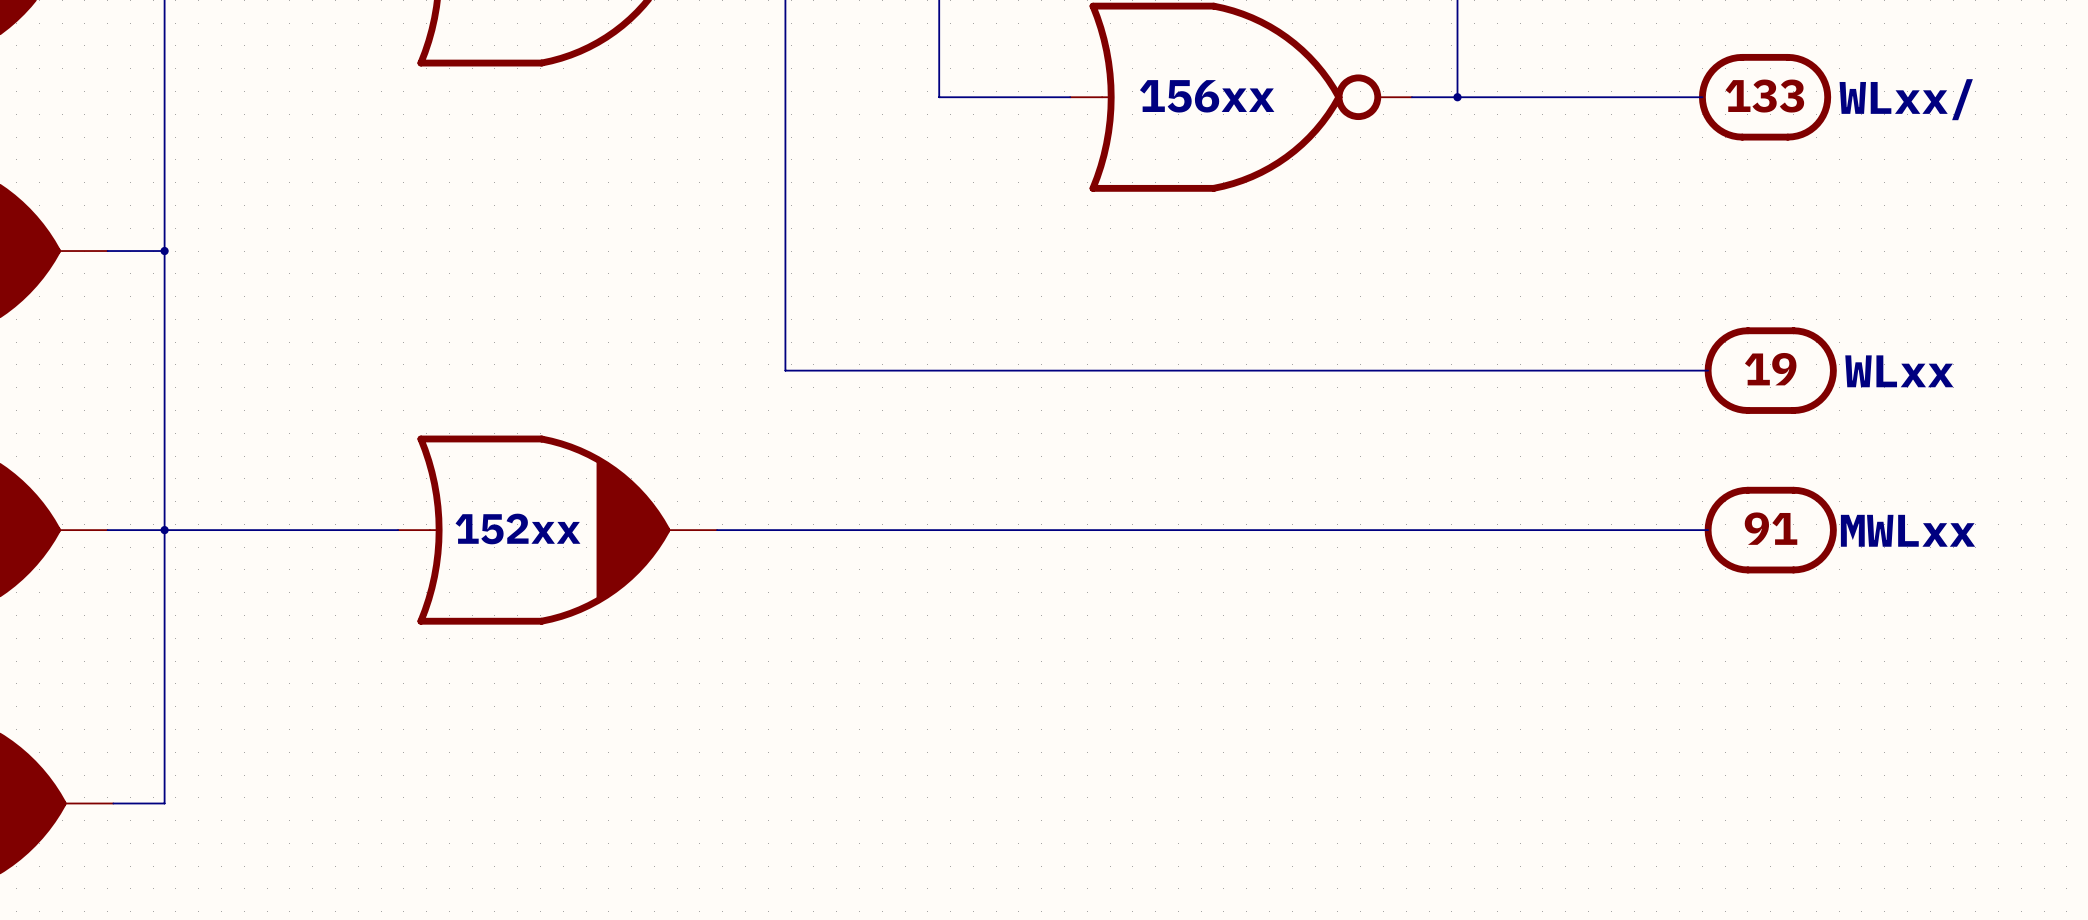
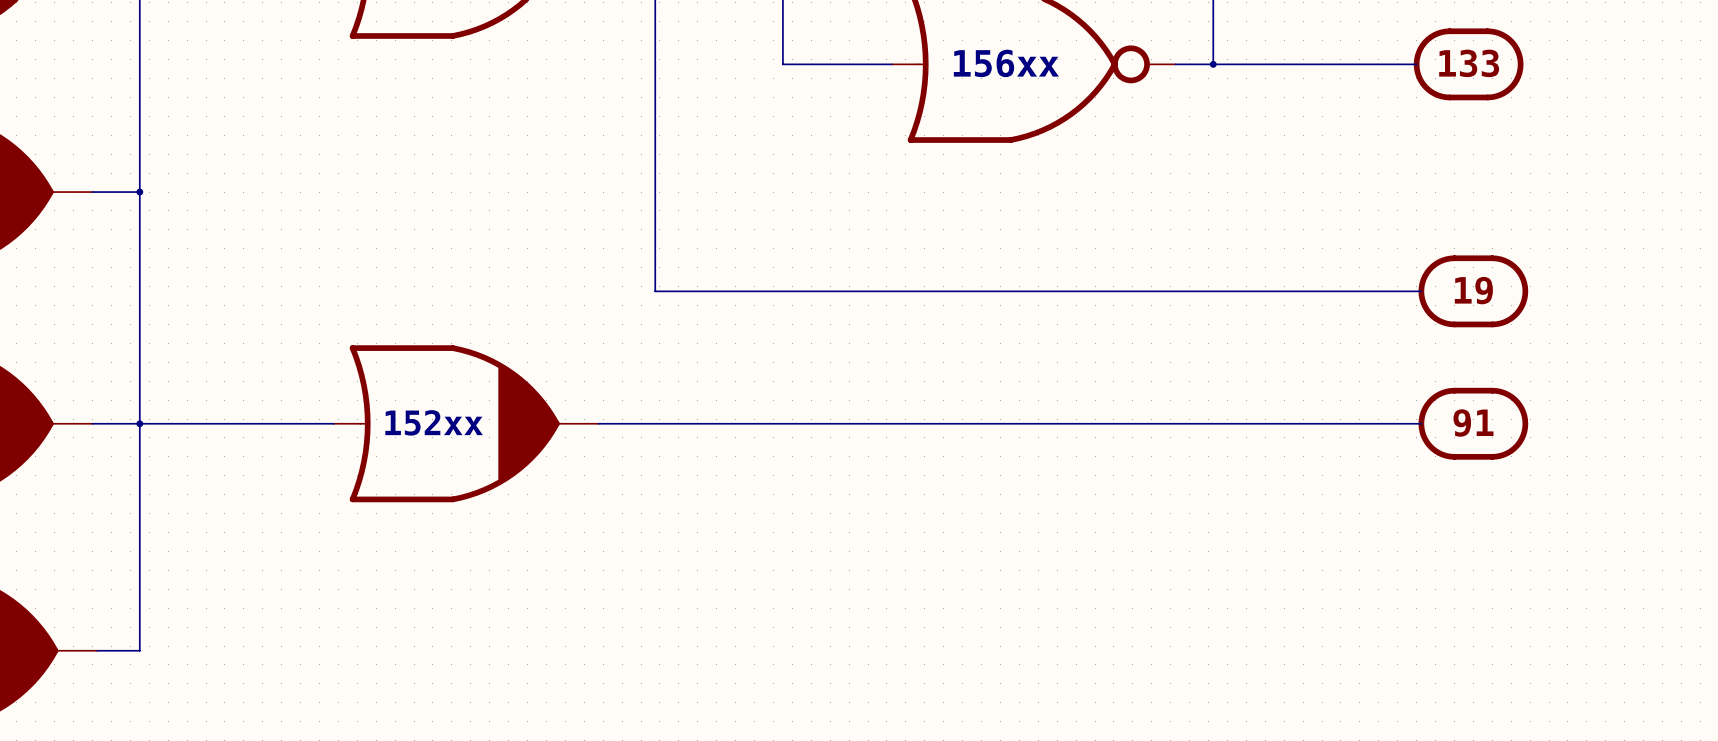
text: WLxx/ (1906, 99) -> none
text: WLxx (1899, 371) -> none
text: MWLxx (1908, 530) -> none

